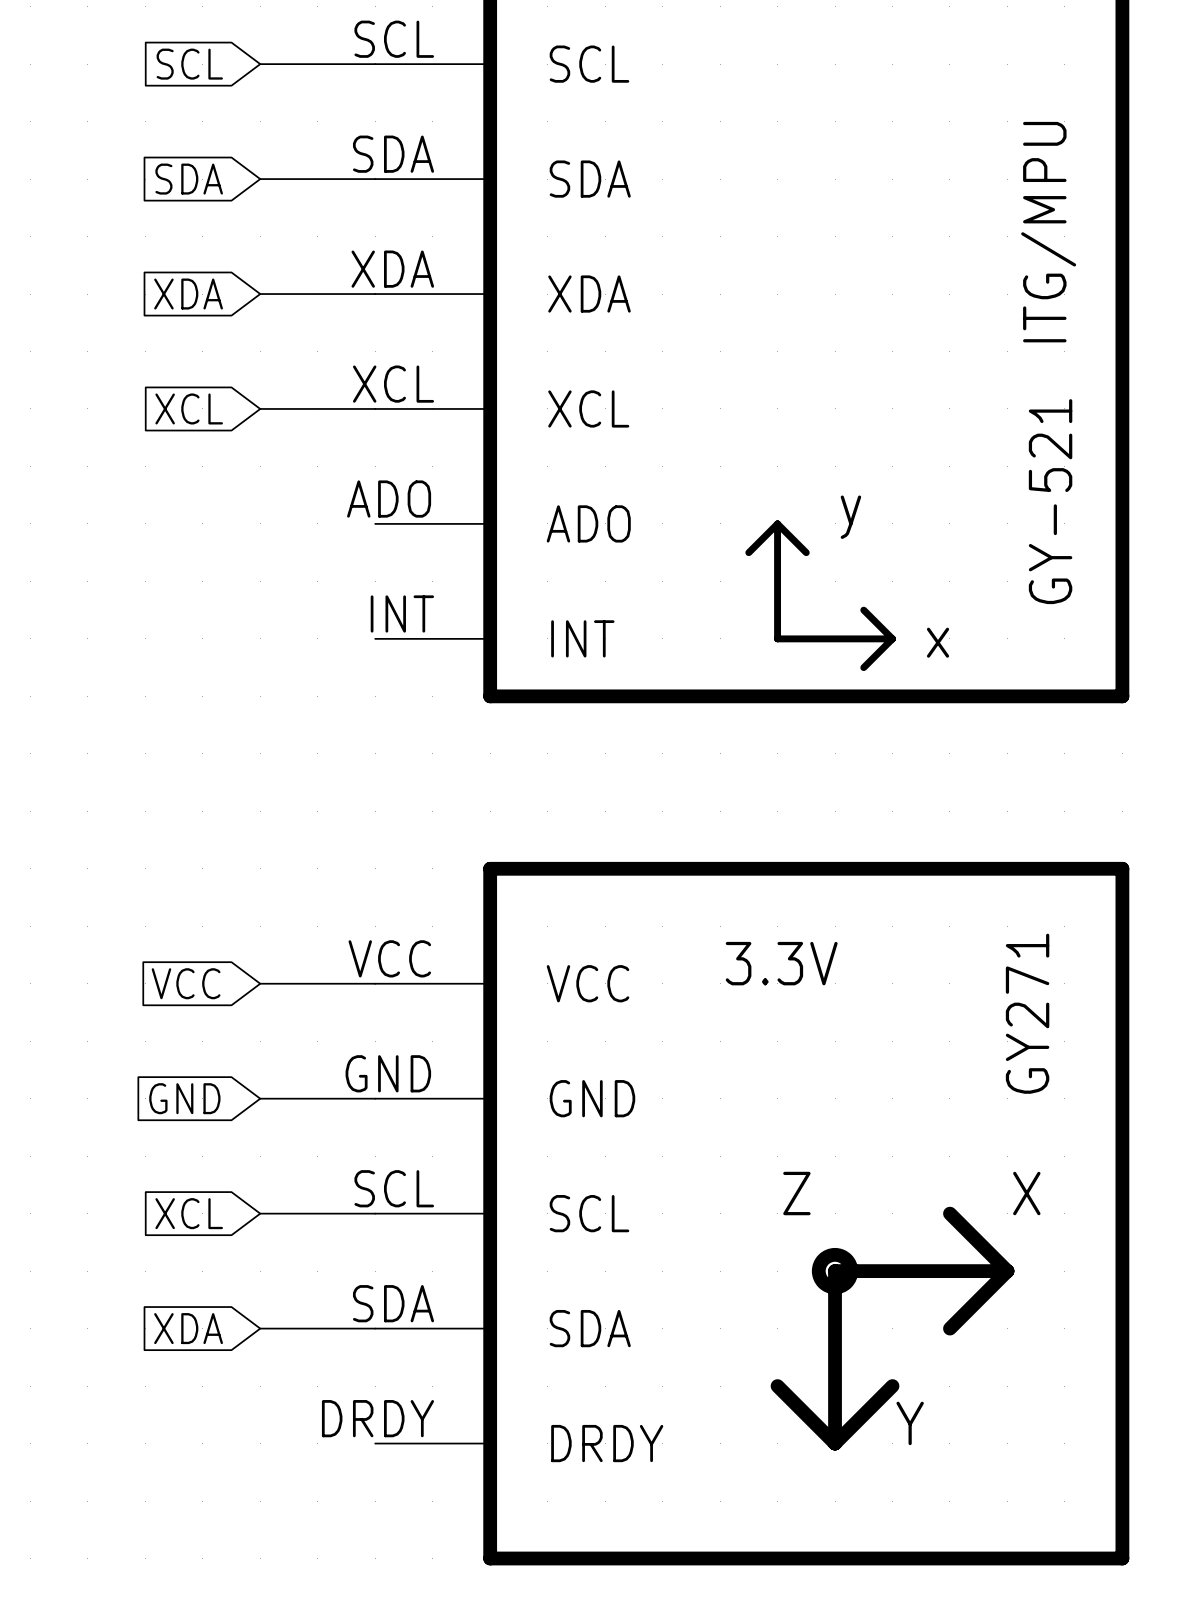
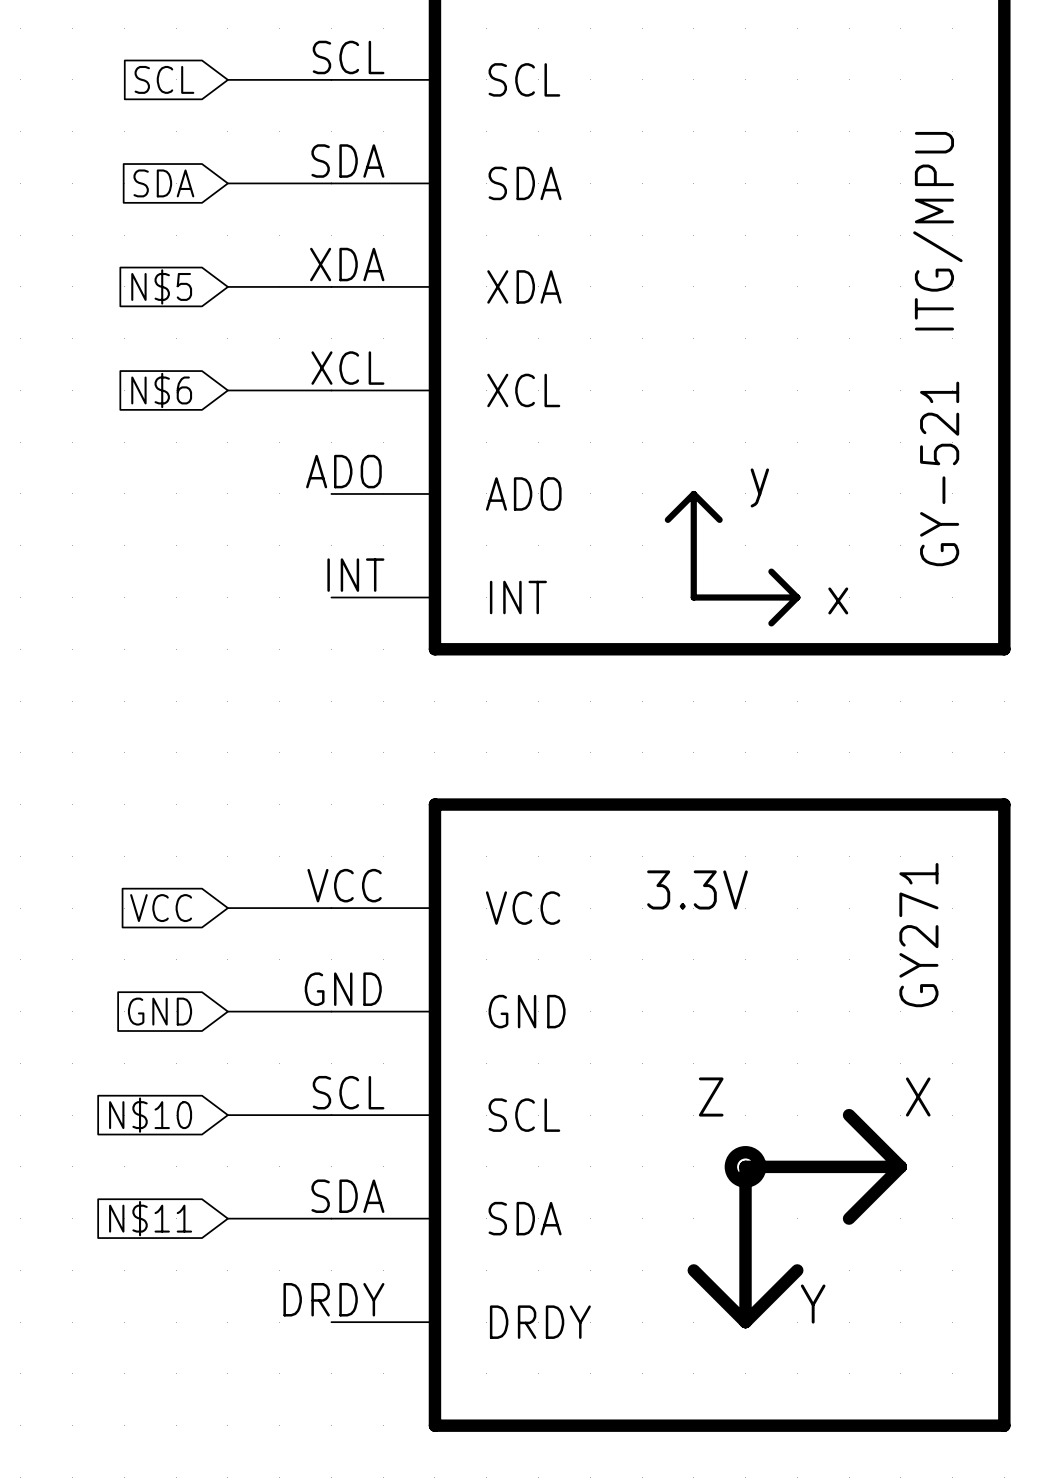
global label: XDA (188, 294) -> N$5 (161, 286)
global label: XCL (189, 408) -> N$6 (161, 390)
global label: XCL (189, 1213) -> N$10 (150, 1115)
global label: XDA (188, 1328) -> N$11 (150, 1218)

